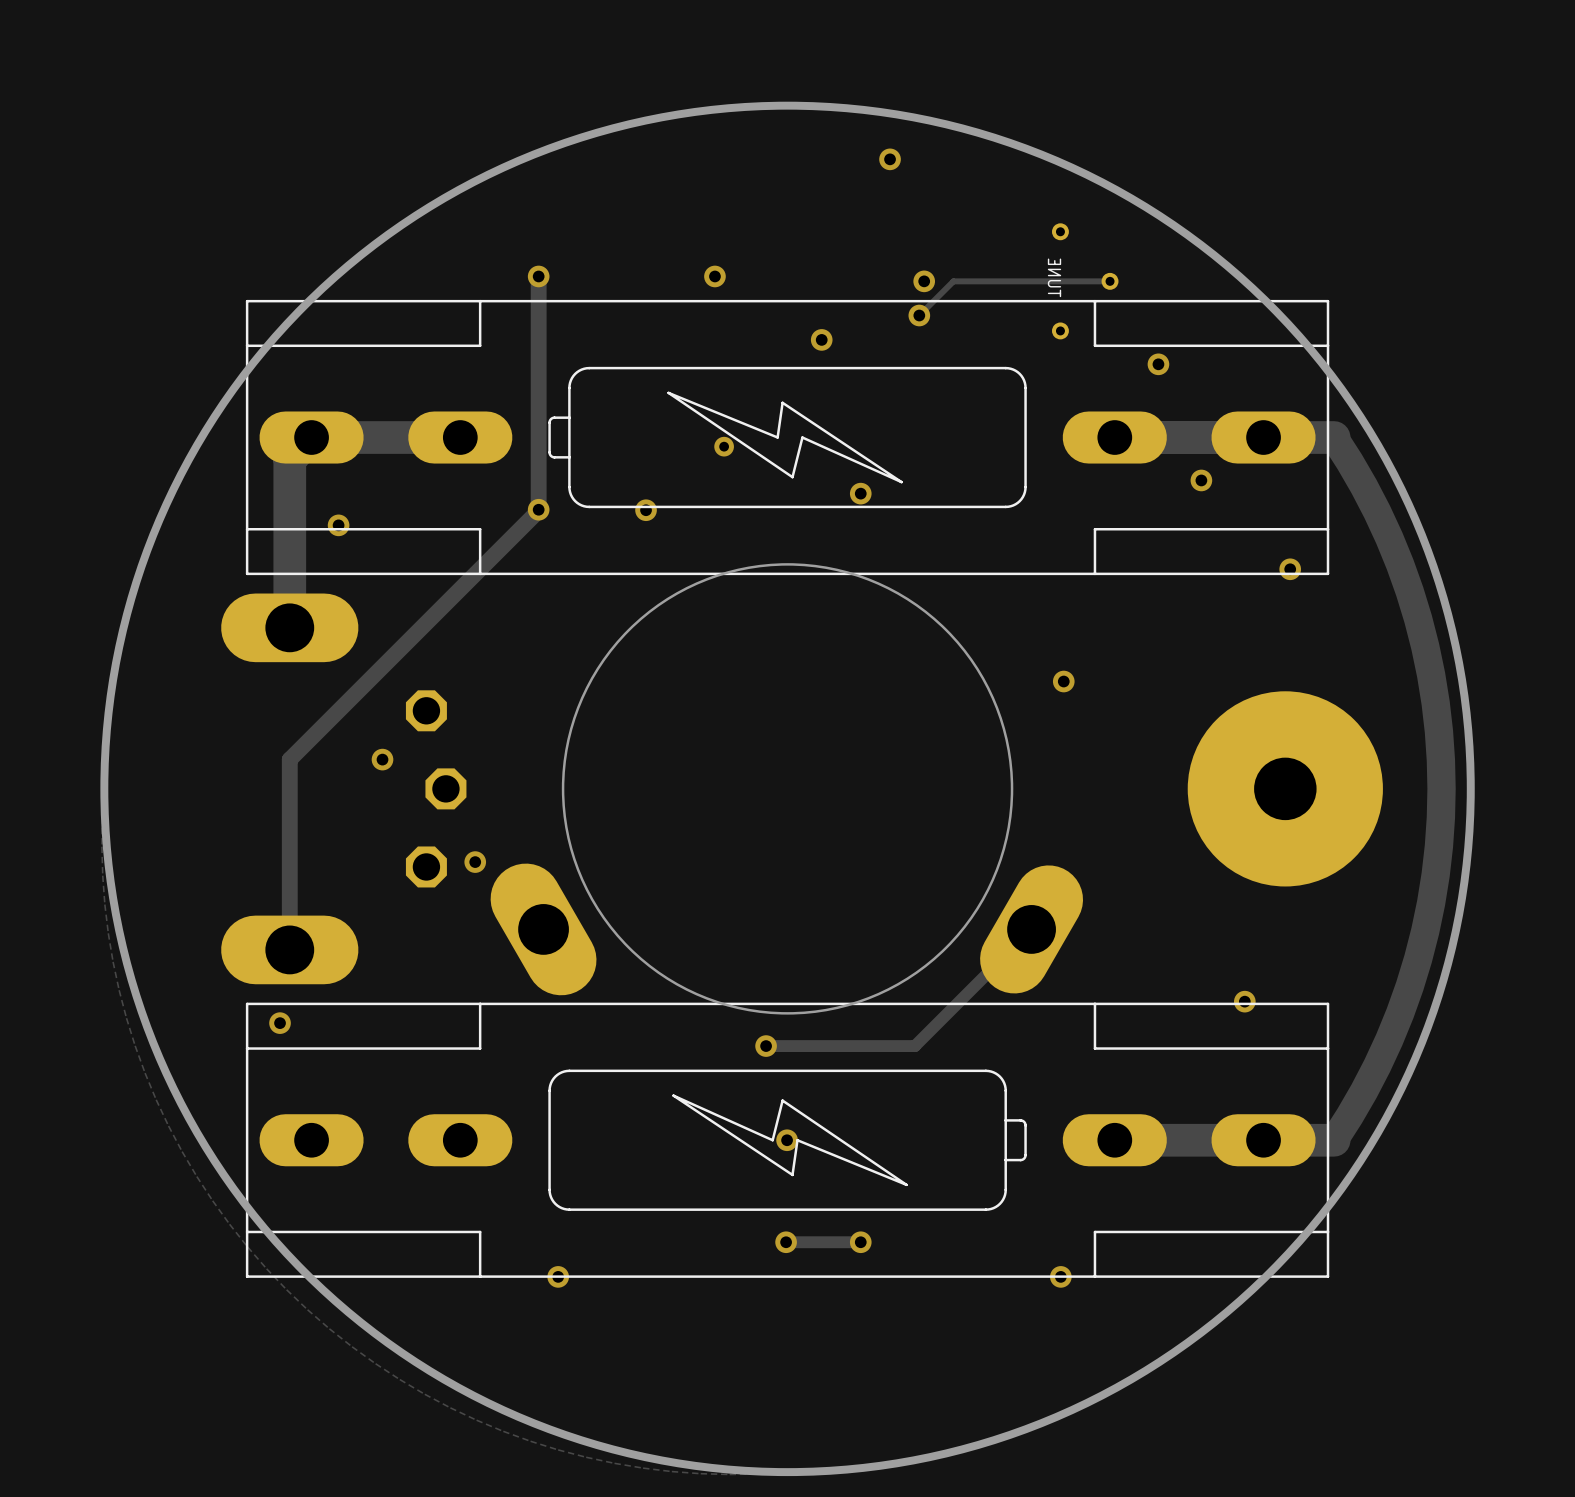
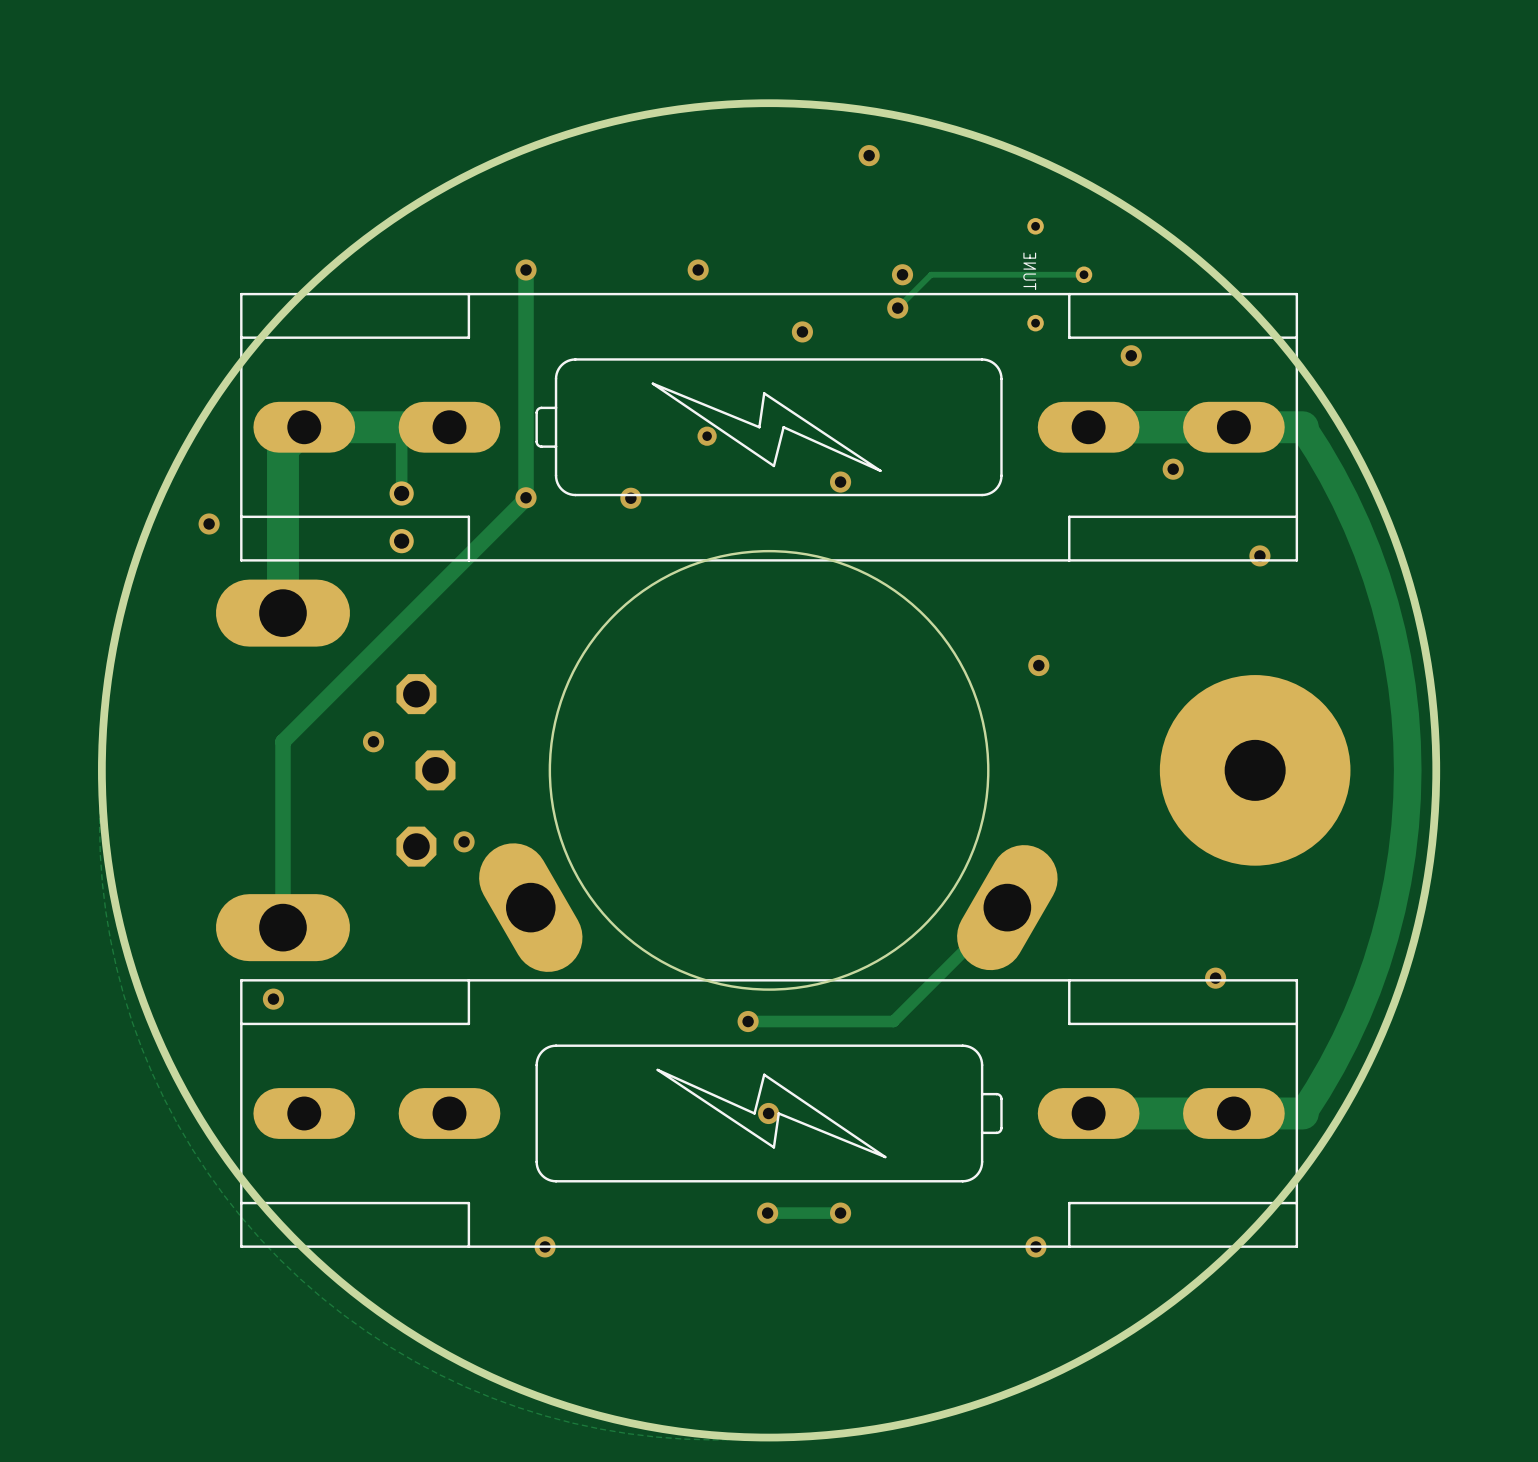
track: none -> (398, 427) (401, 430) (401, 493)
via: (338, 525) -> none
part: none -> (401, 517)
via: none -> (209, 523)

